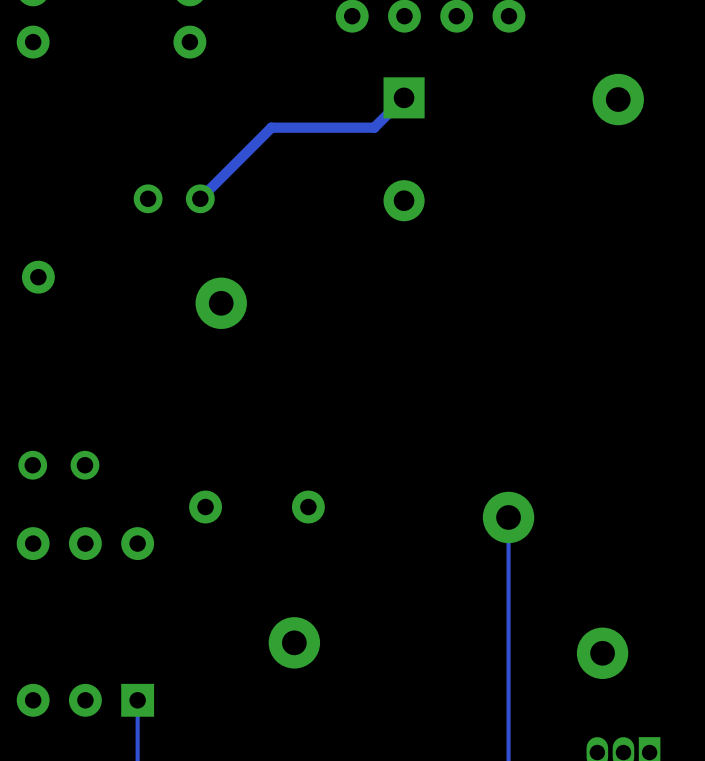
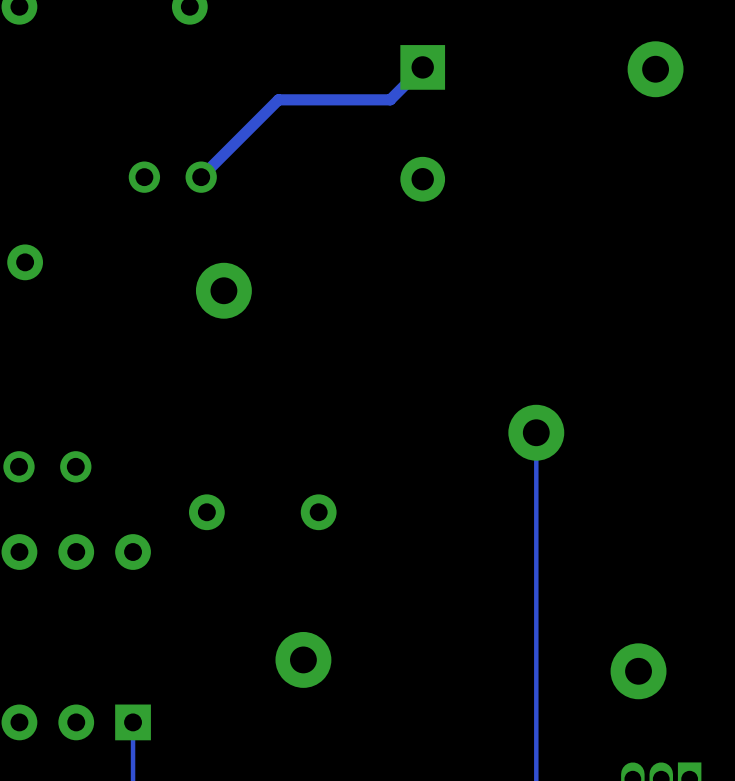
track: none -> (536, 432) (536, 523)
part position: (508, 517) -> (536, 432)

